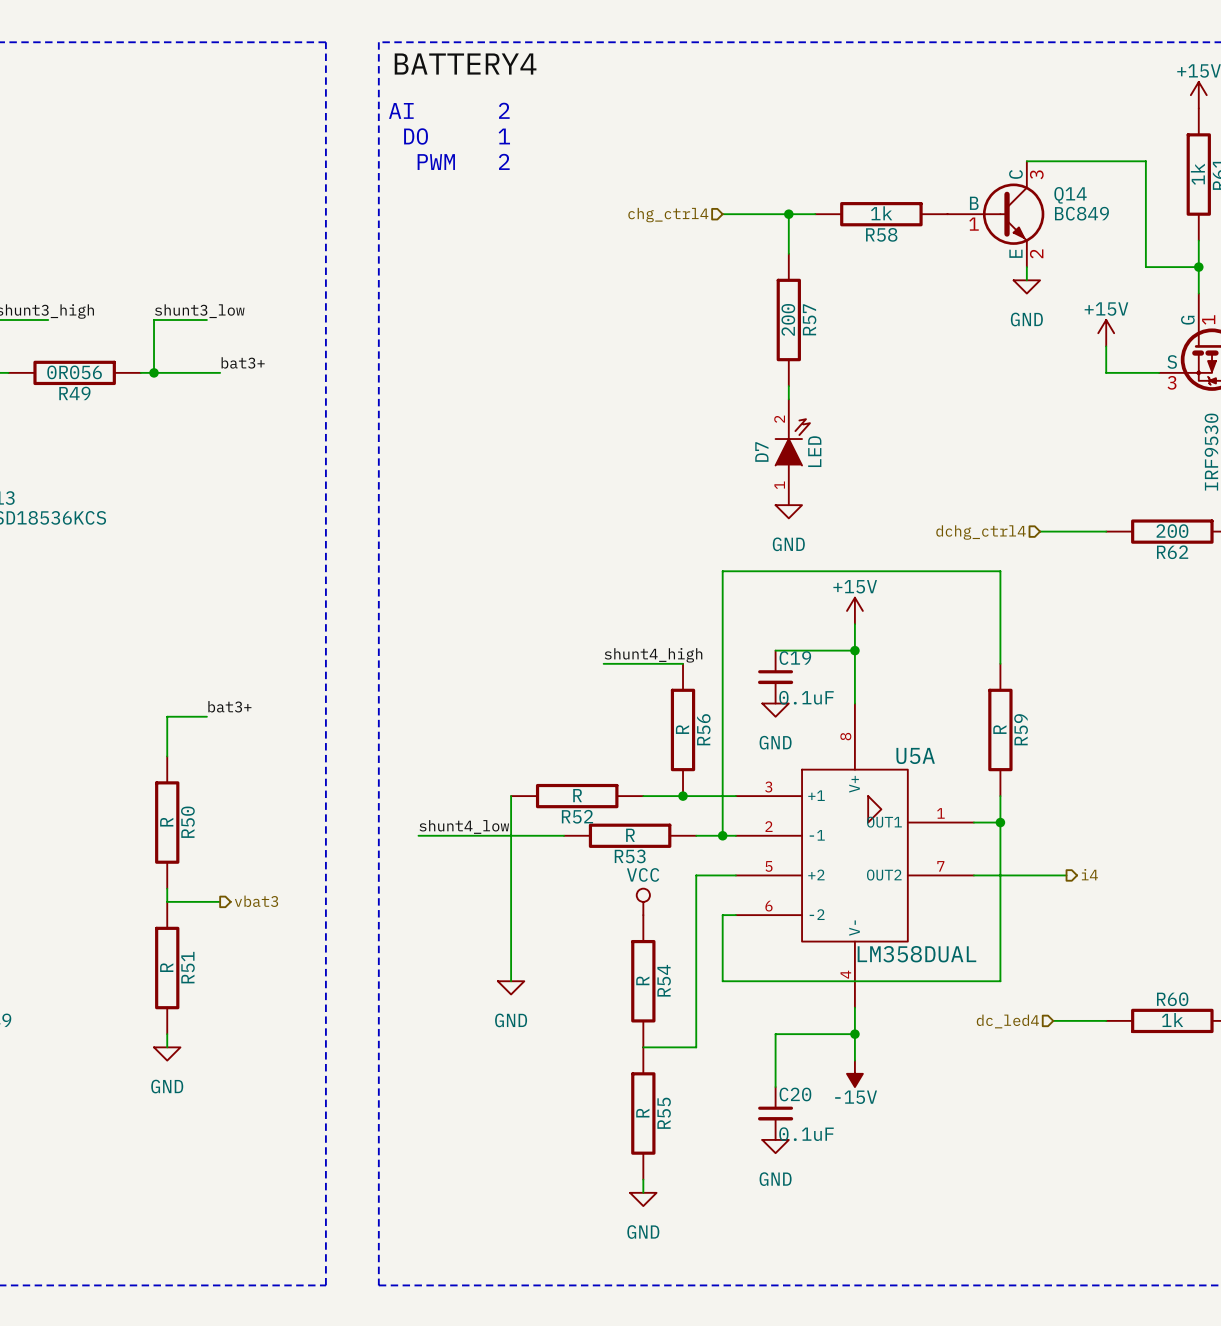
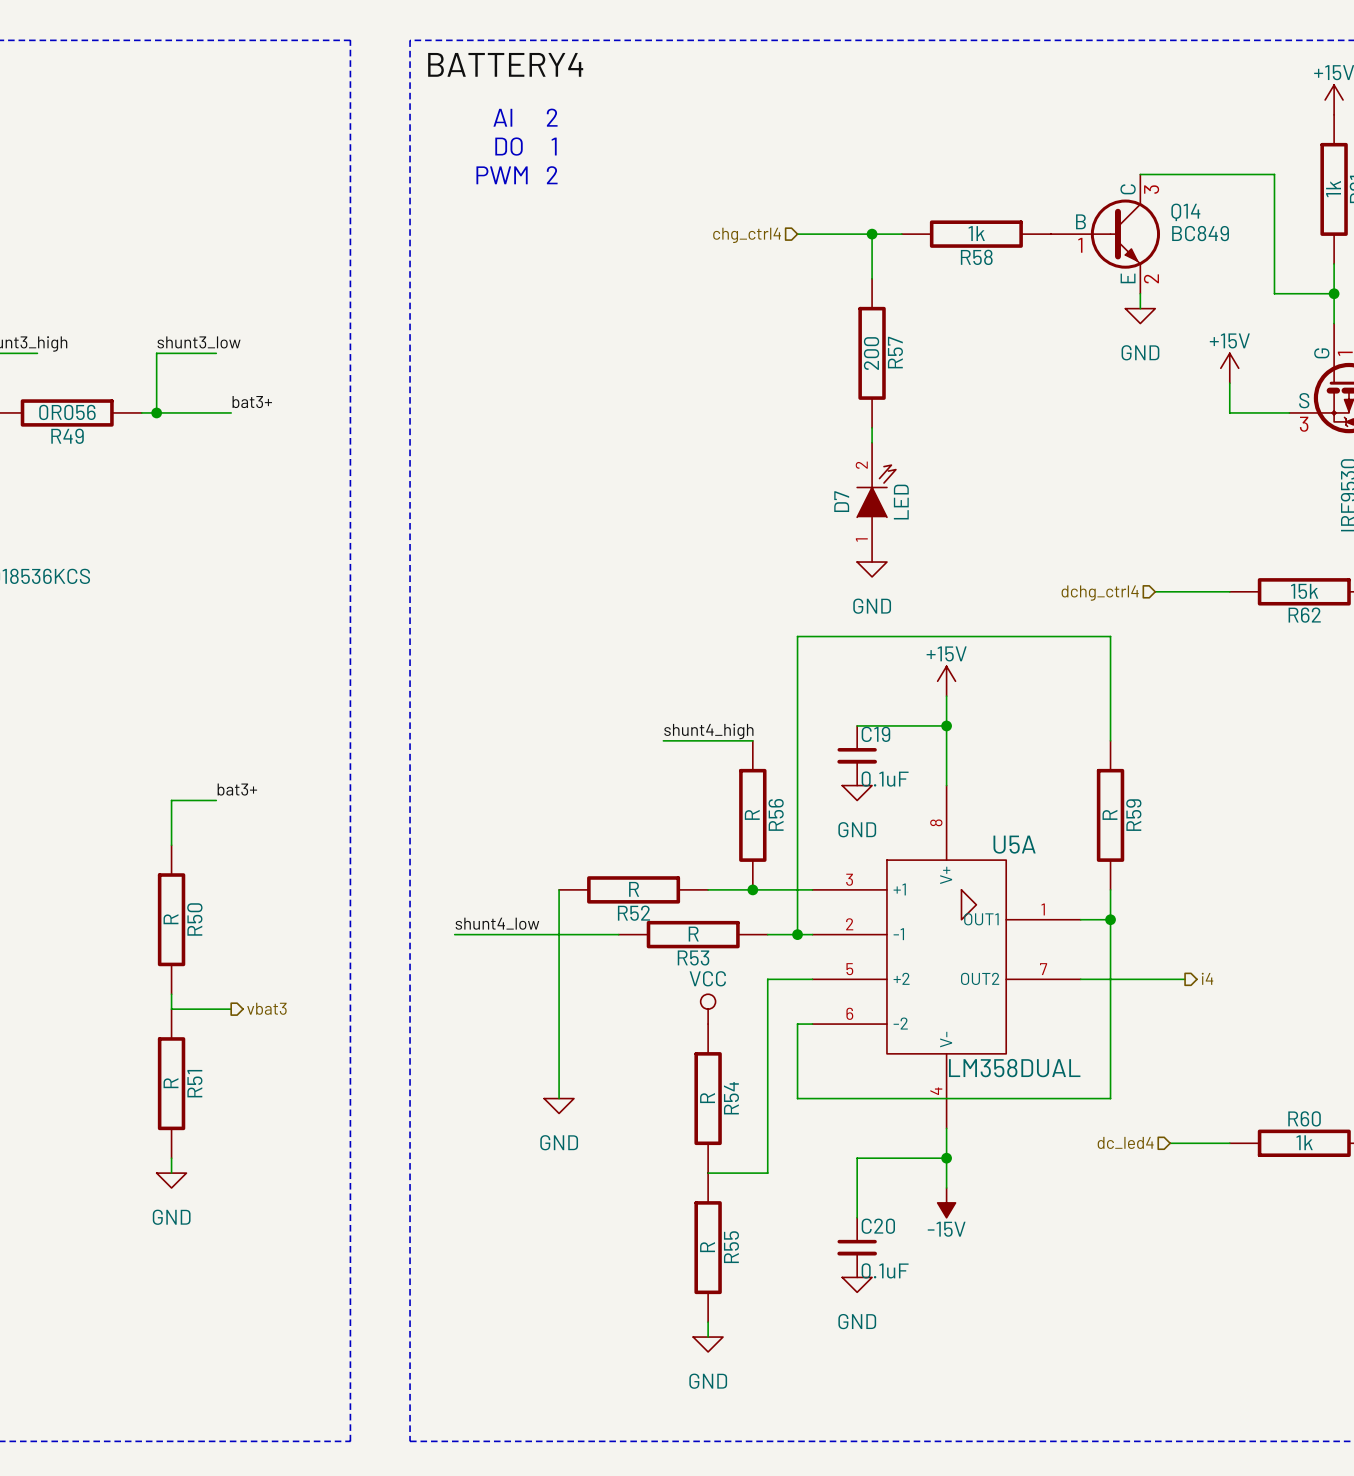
R62 value: 200 (1172, 531) -> 15k (1304, 591)

